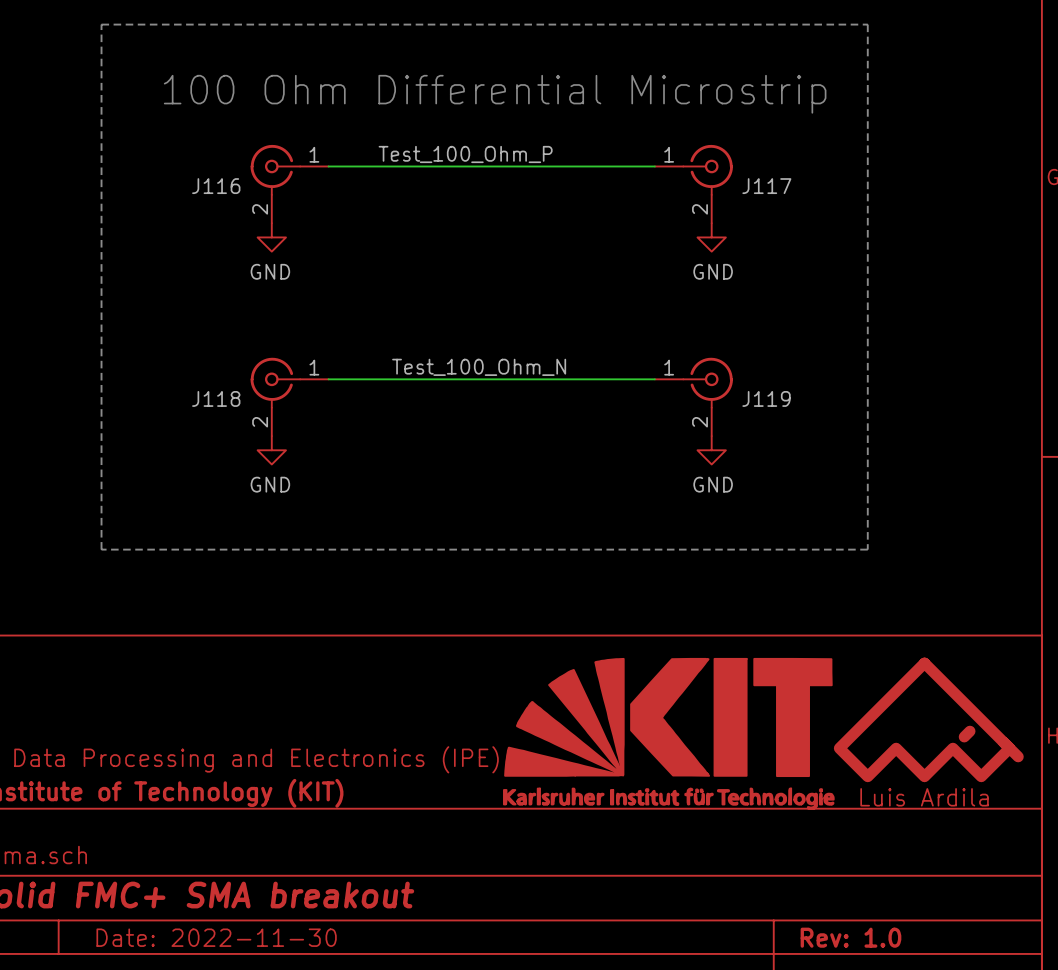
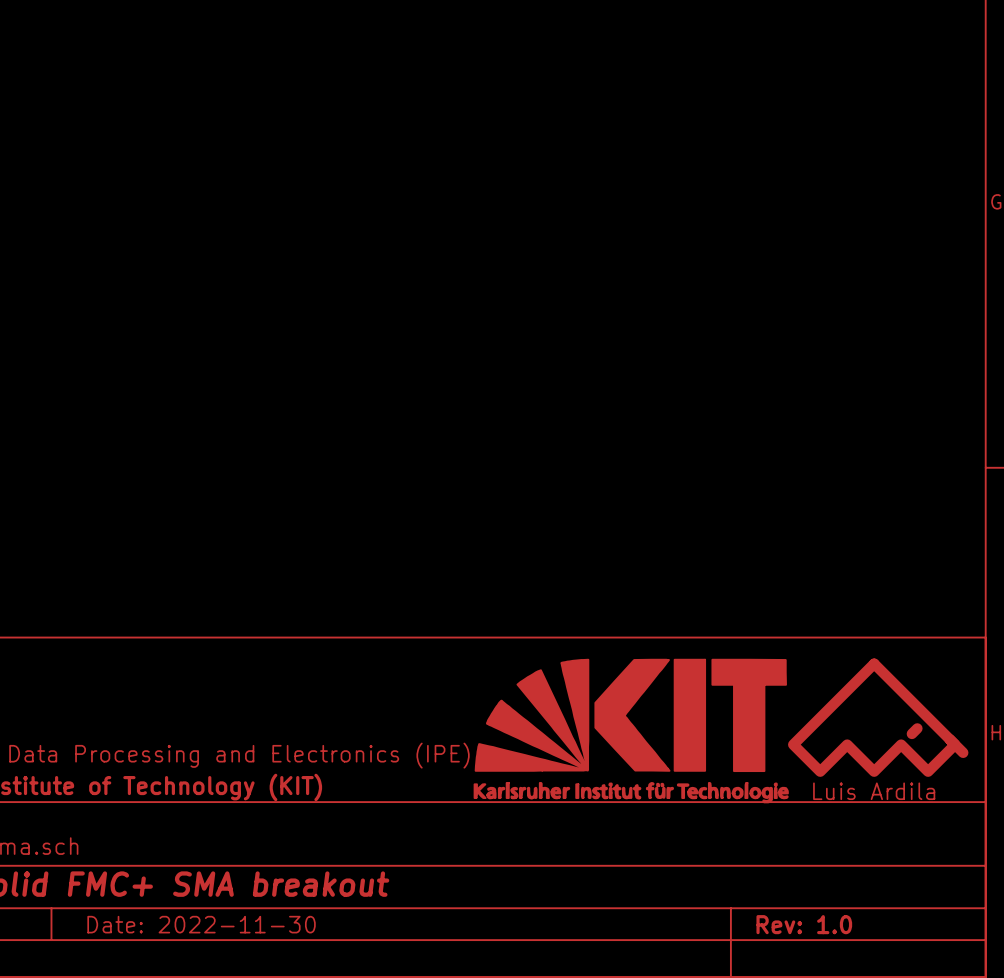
line: (101, 24) (867, 24) (867, 549) (101, 549) (101, 24) -> none
text: 100 Ohm Differential Microstrip (495, 94) -> none
label: Test_100_Ohm_P (465, 154) -> none
wire: (328, 166) (654, 166) -> none
J116: (289, 184) -> none
J117: (693, 184) -> none
power symbol: GND (271, 237) -> none
power symbol: GND (711, 237) -> none
label: Test_100_Ohm_N (479, 367) -> none
wire: (328, 379) (654, 379) -> none
J118: (289, 396) -> none
J119: (693, 396) -> none
power symbol: GND (271, 450) -> none
power symbol: GND (711, 450) -> none

